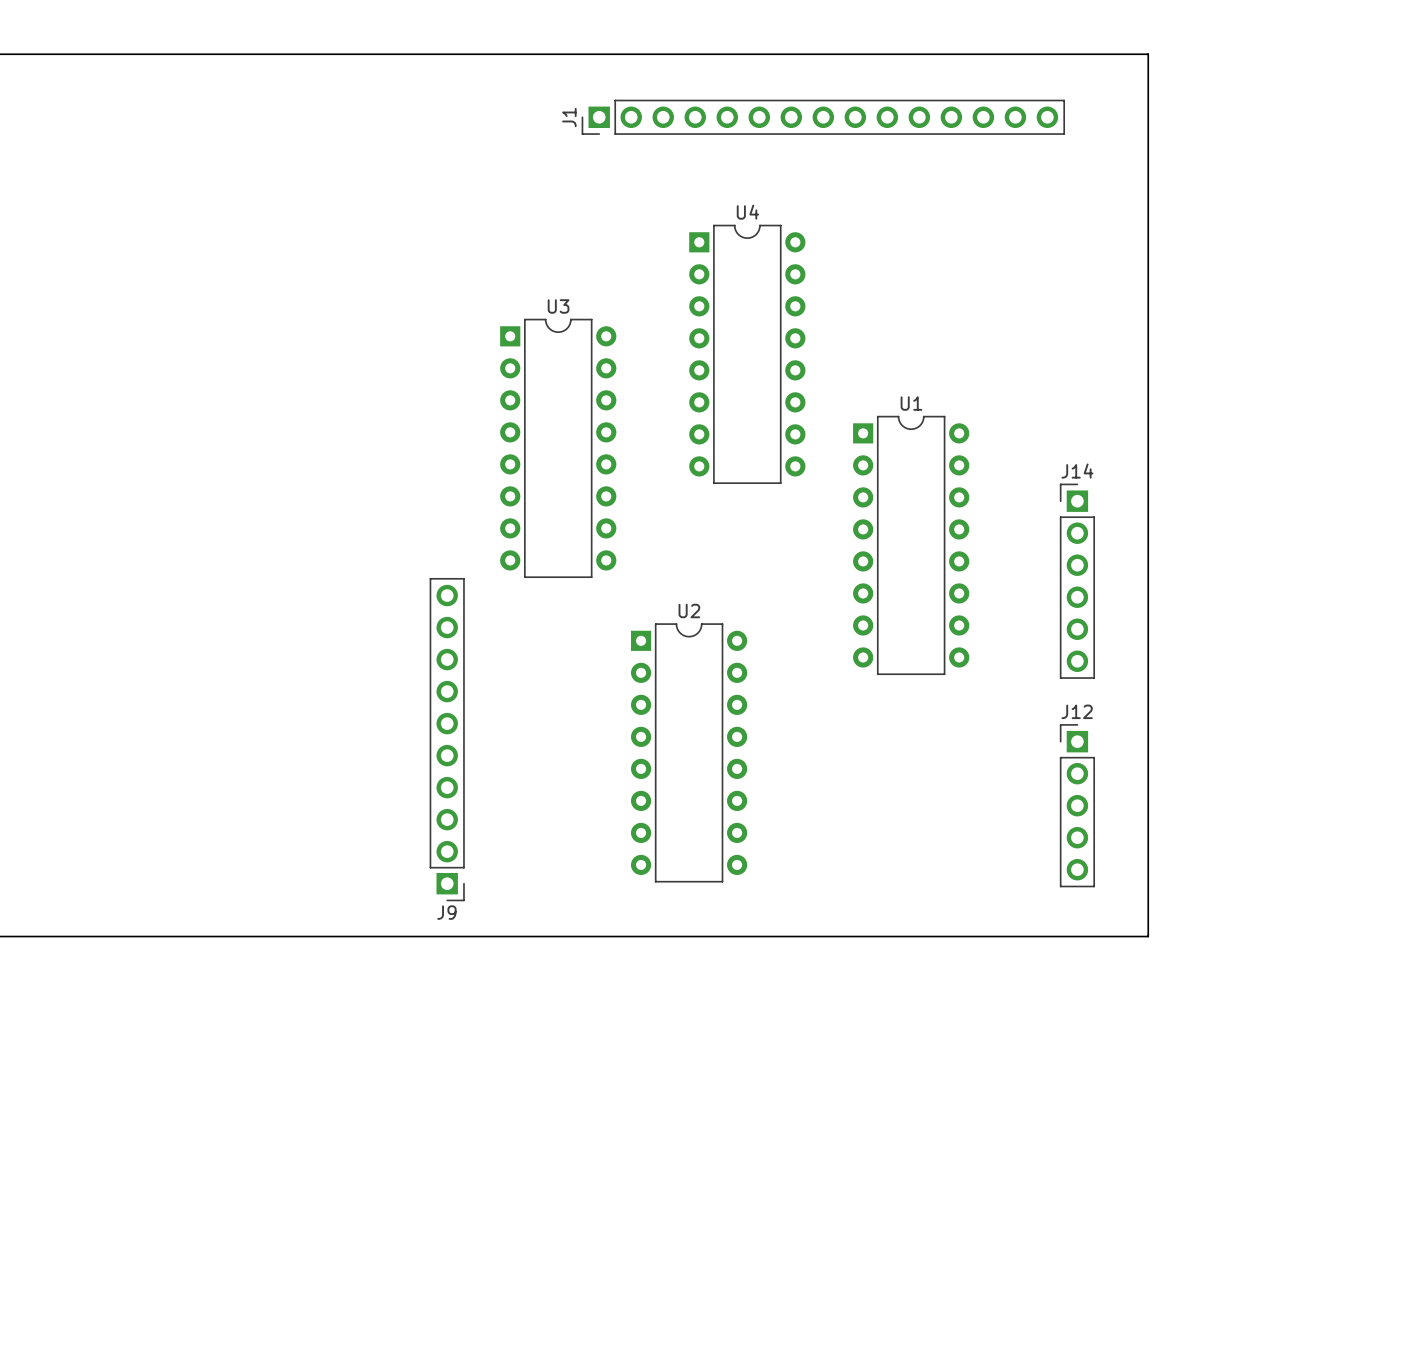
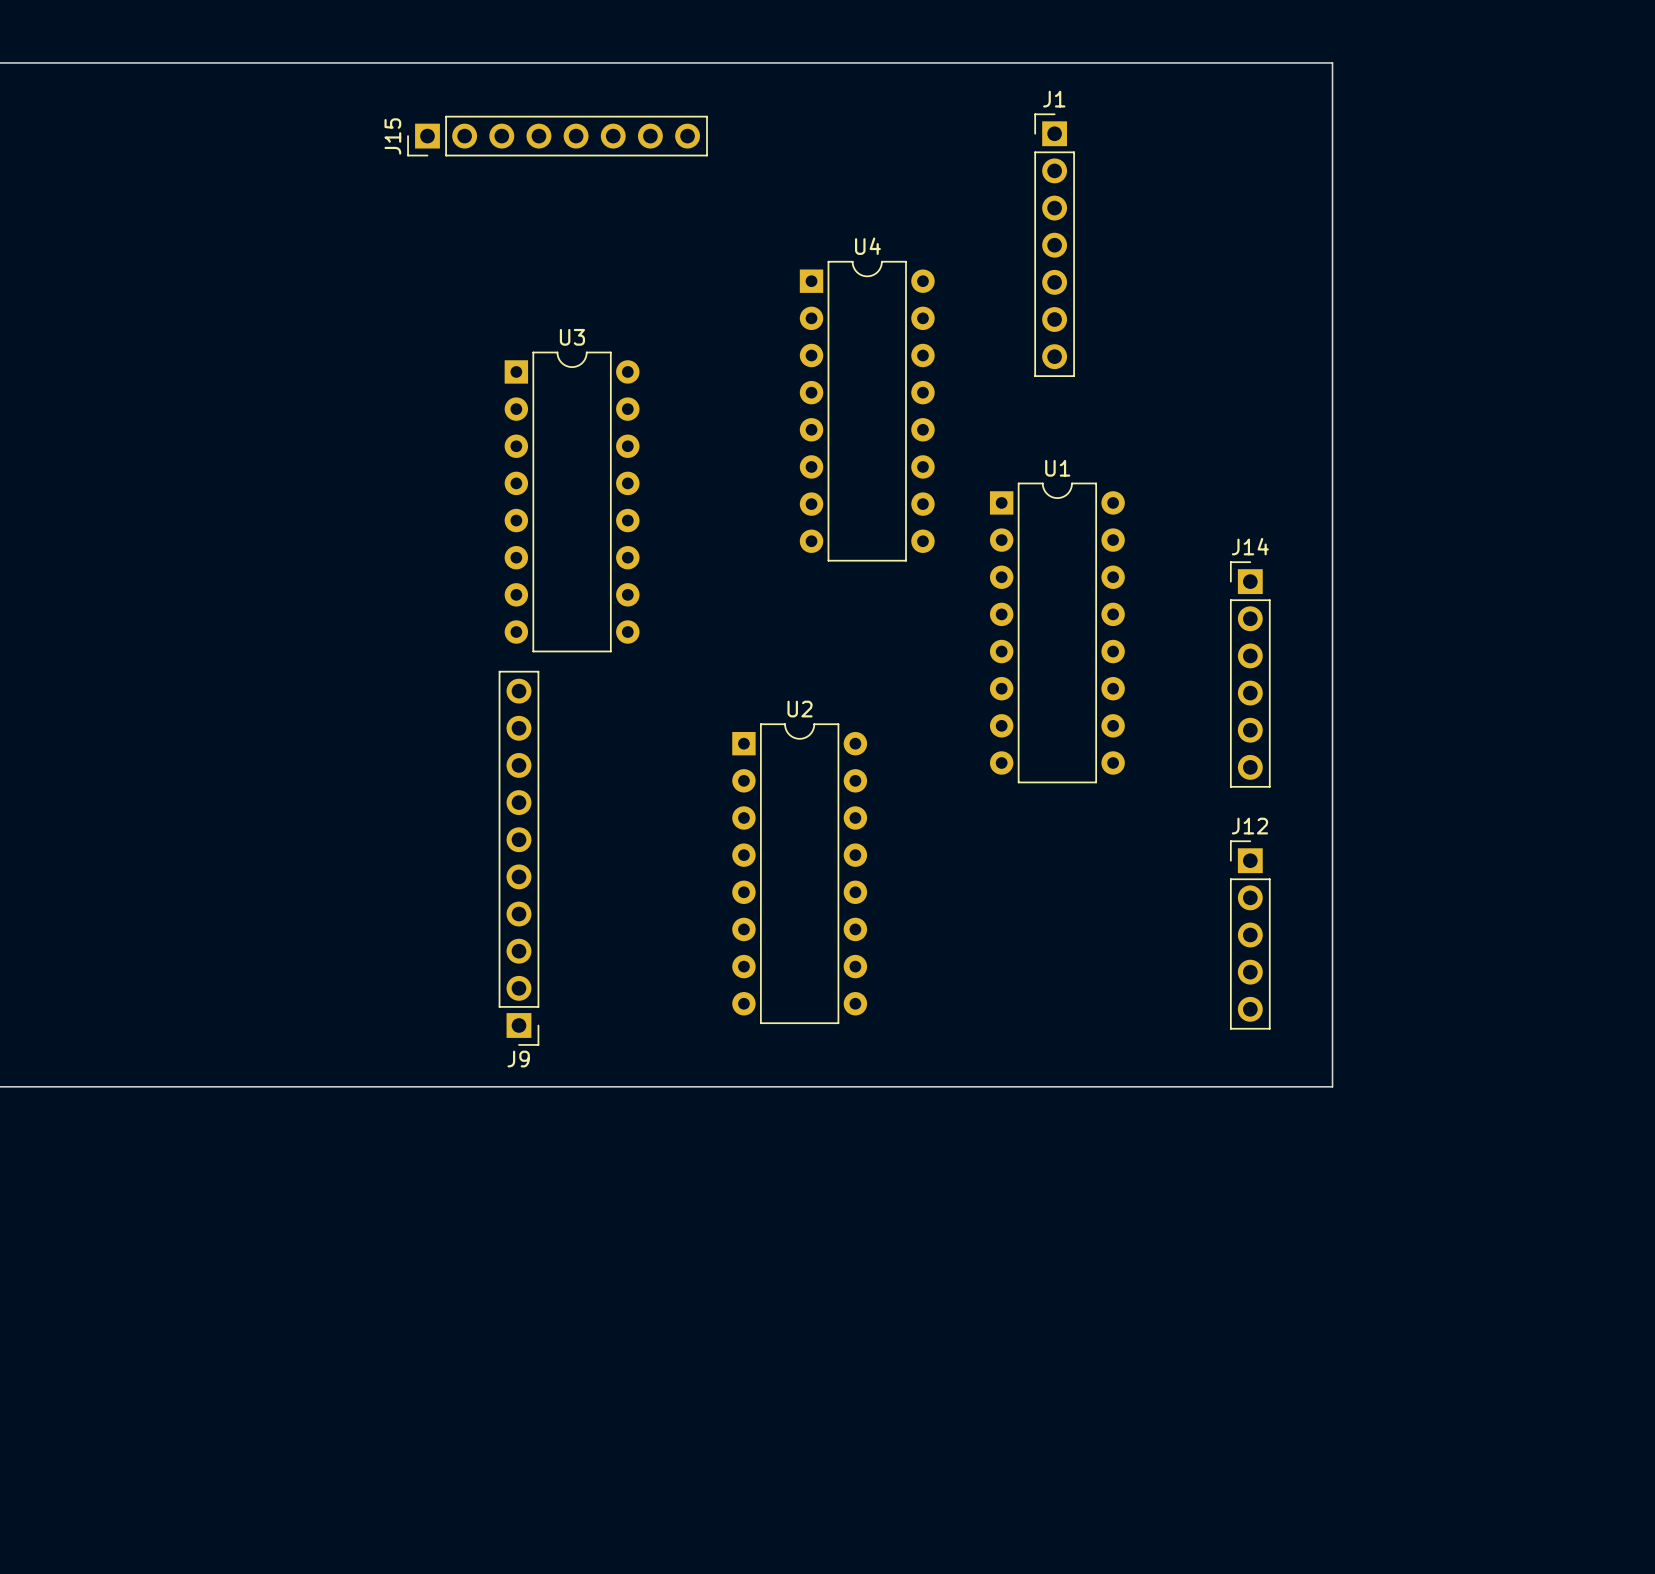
J1 footprint: [581, 99, 1065, 135] -> [1034, 113, 1075, 377]
J15: none -> (557, 136)
J1 name position: J1 (569, 117) -> J1 (1054, 99)
U3 position: (558, 448) -> (572, 501)

